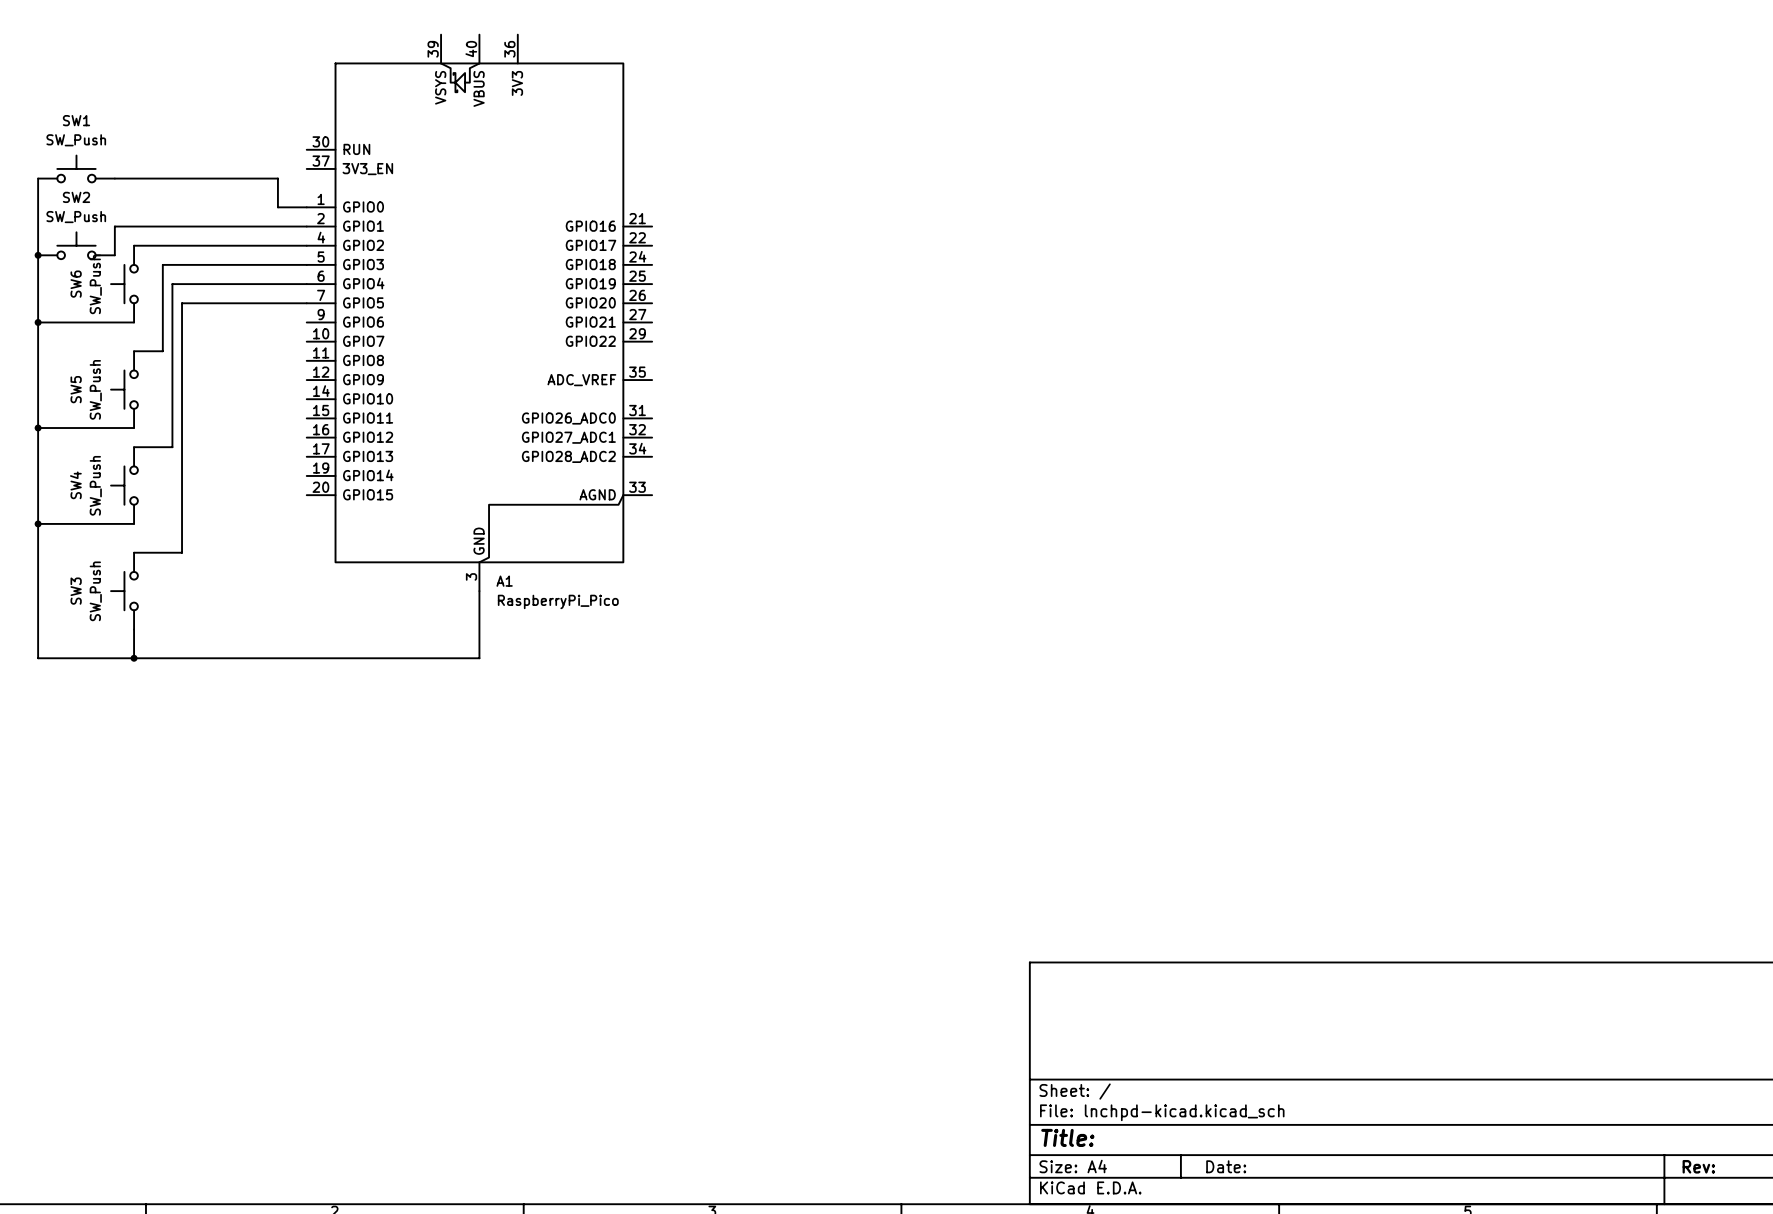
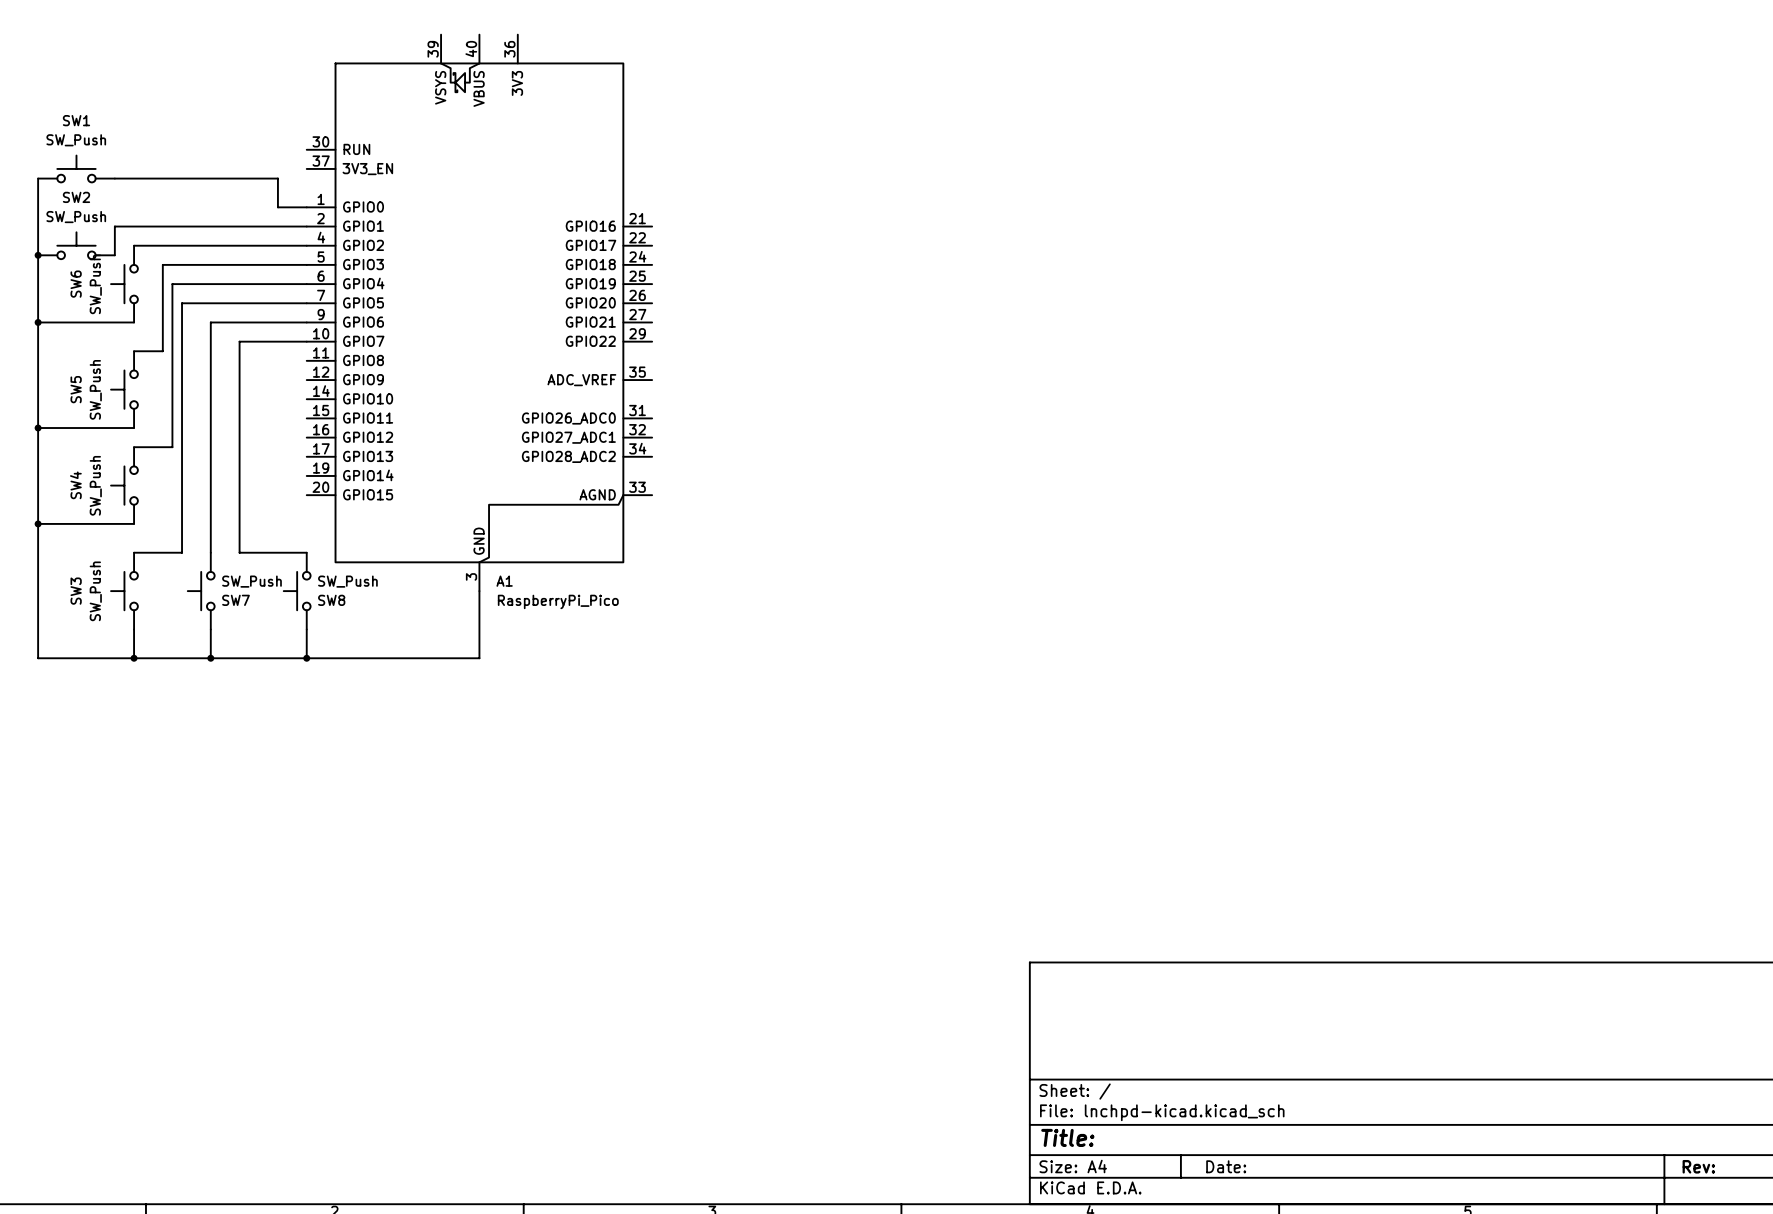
wire: none -> (306, 322) (210, 322) (210, 552)
wire: none -> (306, 341) (239, 341) (239, 552) (306, 552)
SW7: none -> SW_Push (201, 591)
SW8: none -> SW_Push (297, 591)
wire: none -> (210, 629) (210, 658)
wire: none -> (306, 629) (306, 658)
junction: none -> (210, 658)
junction: none -> (306, 658)

